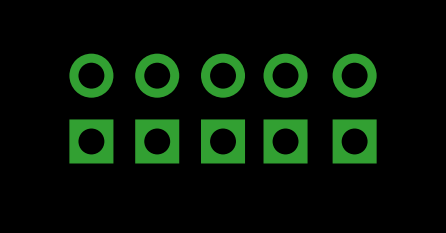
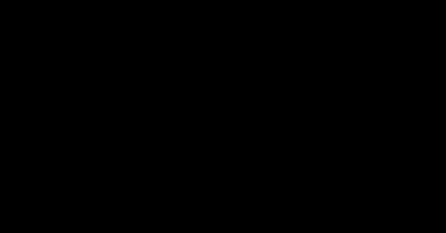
part: (91, 108) -> none
part: (157, 108) -> none
part: (223, 108) -> none
part: (285, 108) -> none
part: (354, 108) -> none

